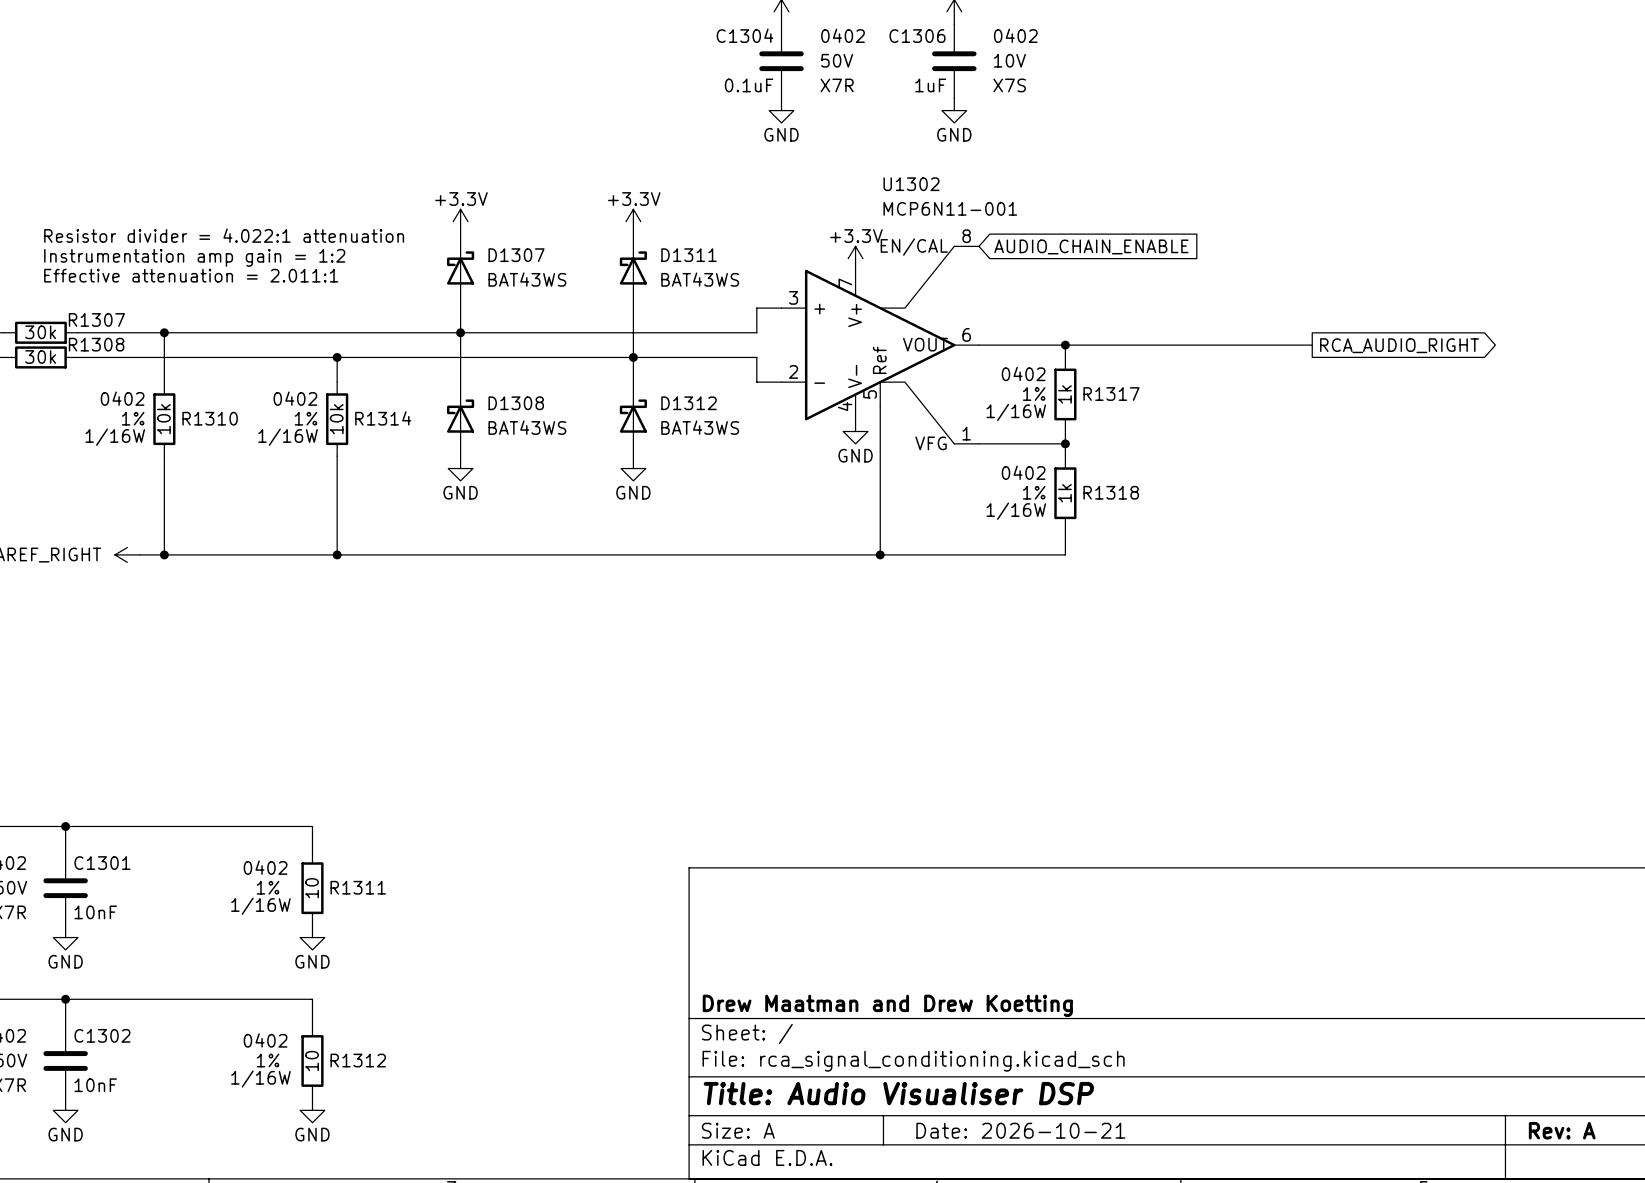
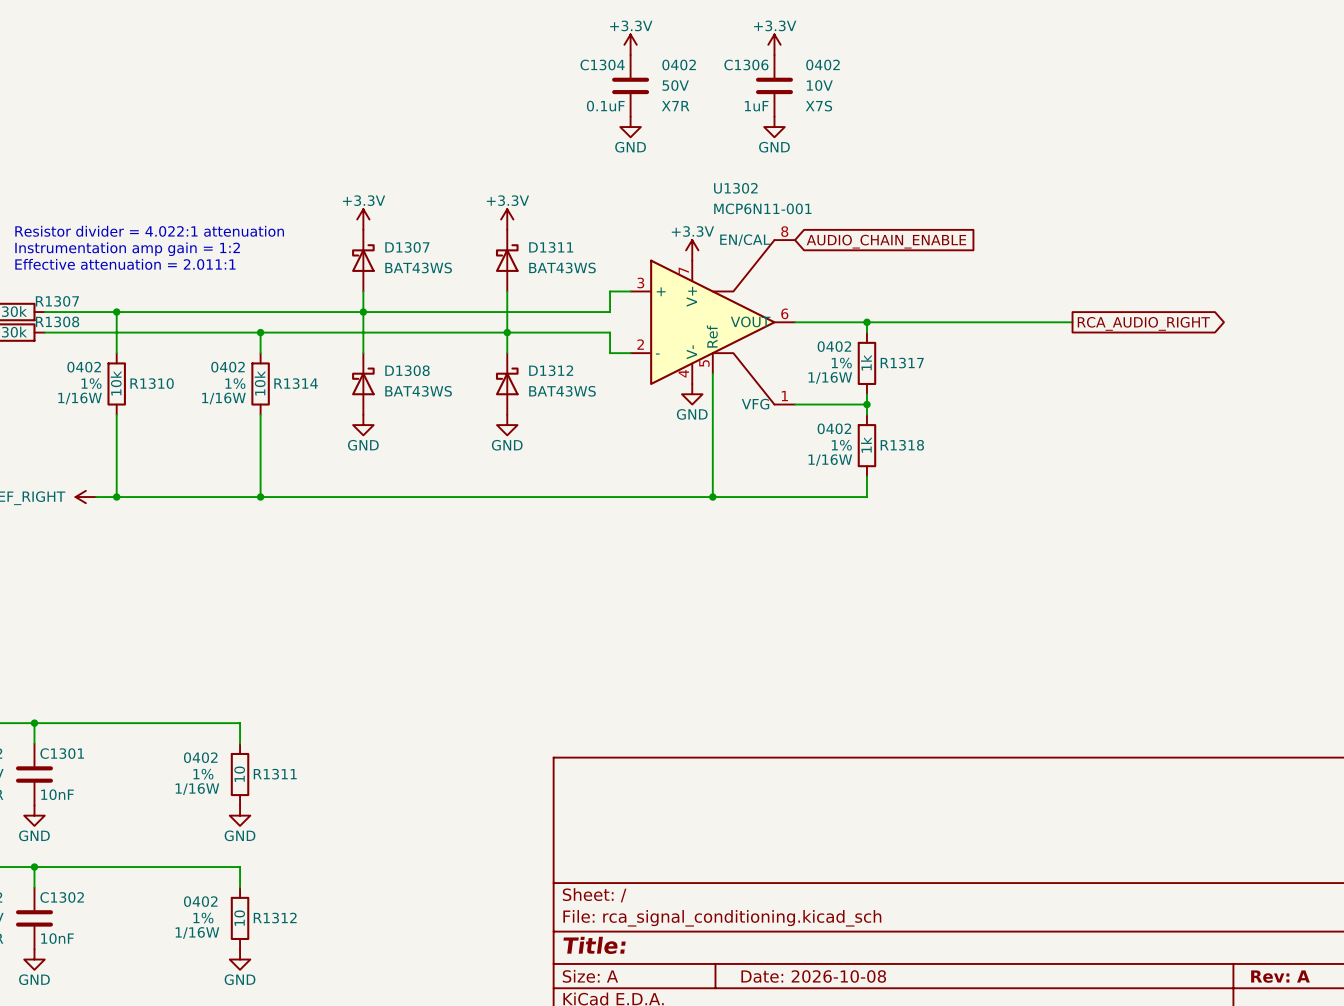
title block: Drew Maatman and Drew Koetting (887, 1005) -> none
title block: Title: Audio Visualiser DSP (898, 1093) -> Title: (594, 945)
title block: Date: 2026-10-21 (1020, 1130) -> Date: 2026-10-08 (813, 976)

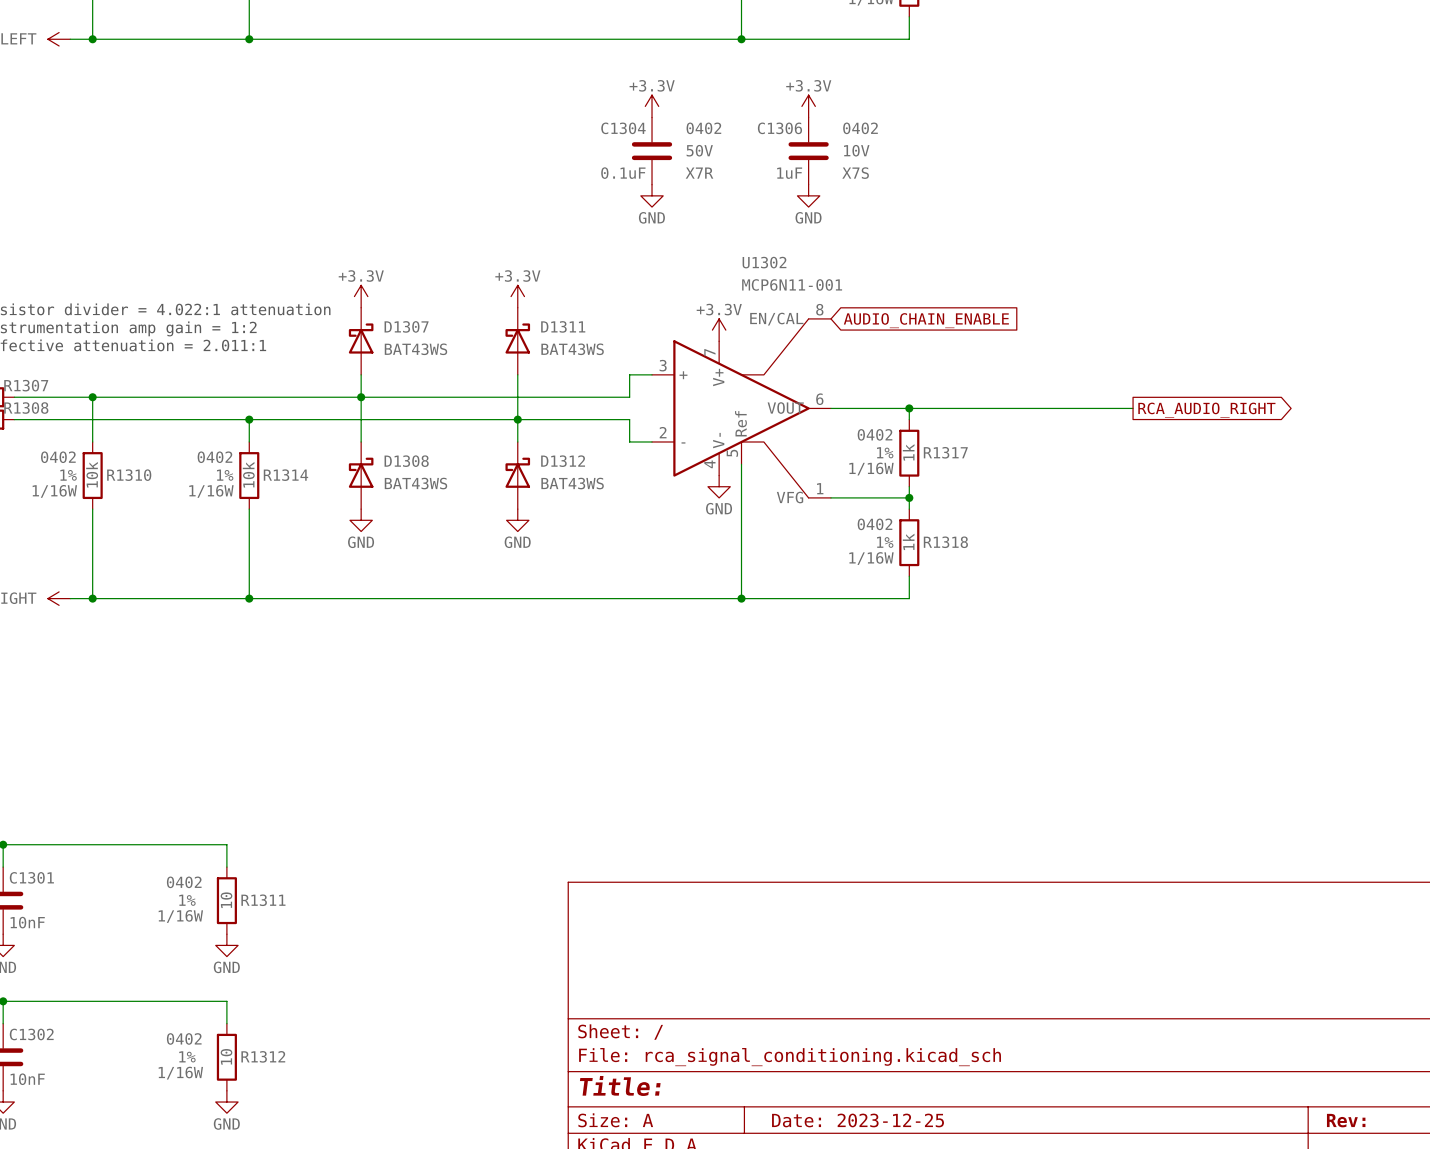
title block: Date: 2026-10-08 (813, 976) -> Date: 2023-12-25 (858, 1120)
title block: Rev: A (1280, 976) -> Rev: (1346, 1120)

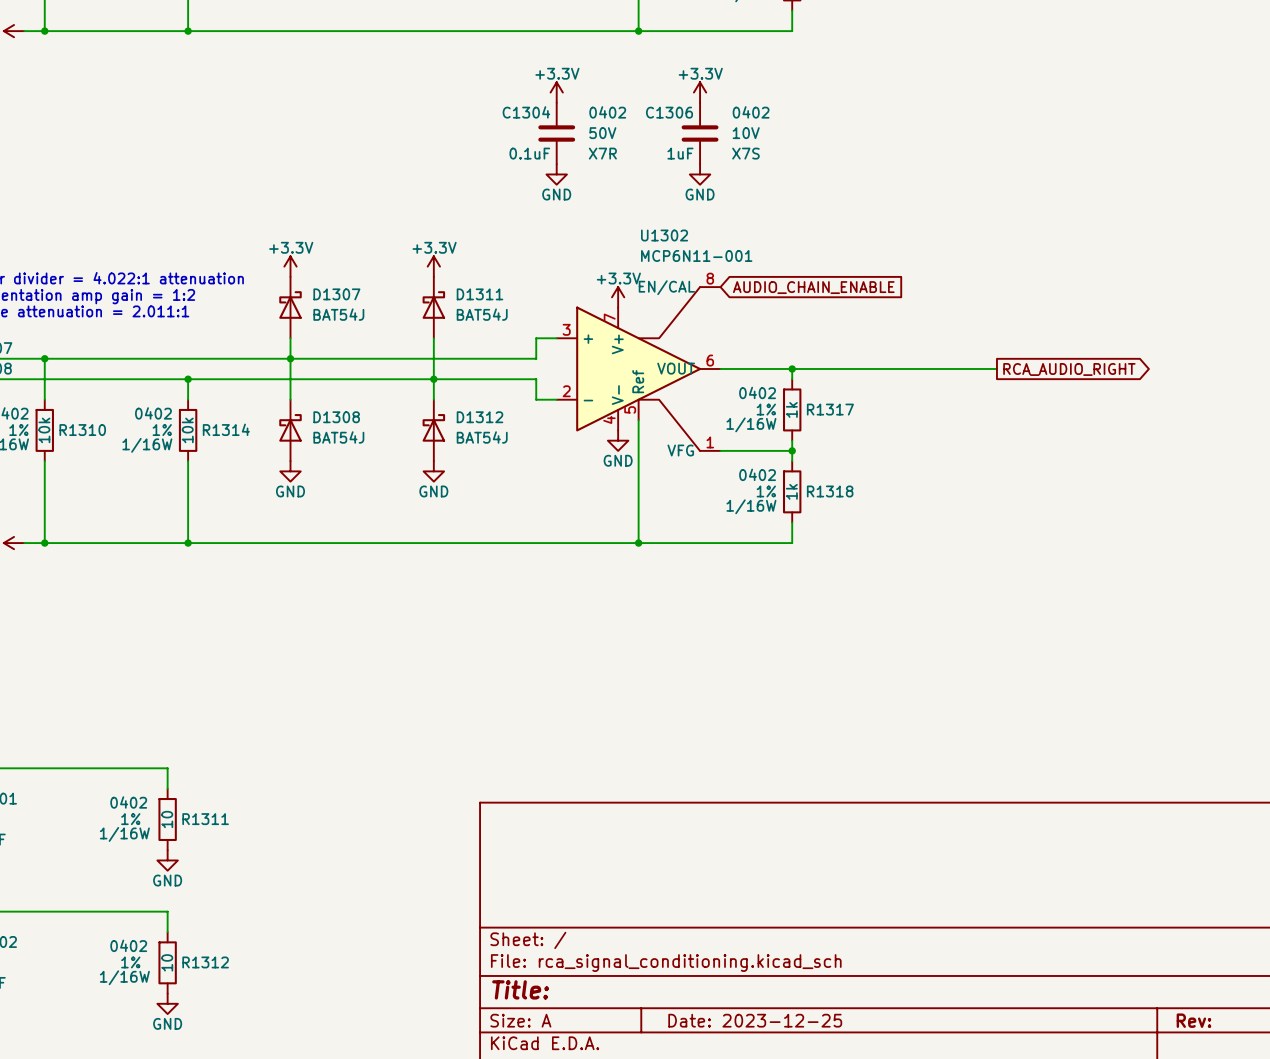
D1307 value: BAT43WS (415, 349) -> BAT54J (338, 314)
D1311 value: BAT43WS (572, 349) -> BAT54J (482, 314)
D1308 value: BAT43WS (415, 483) -> BAT54J (338, 437)
D1312 value: BAT43WS (572, 483) -> BAT54J (482, 437)

